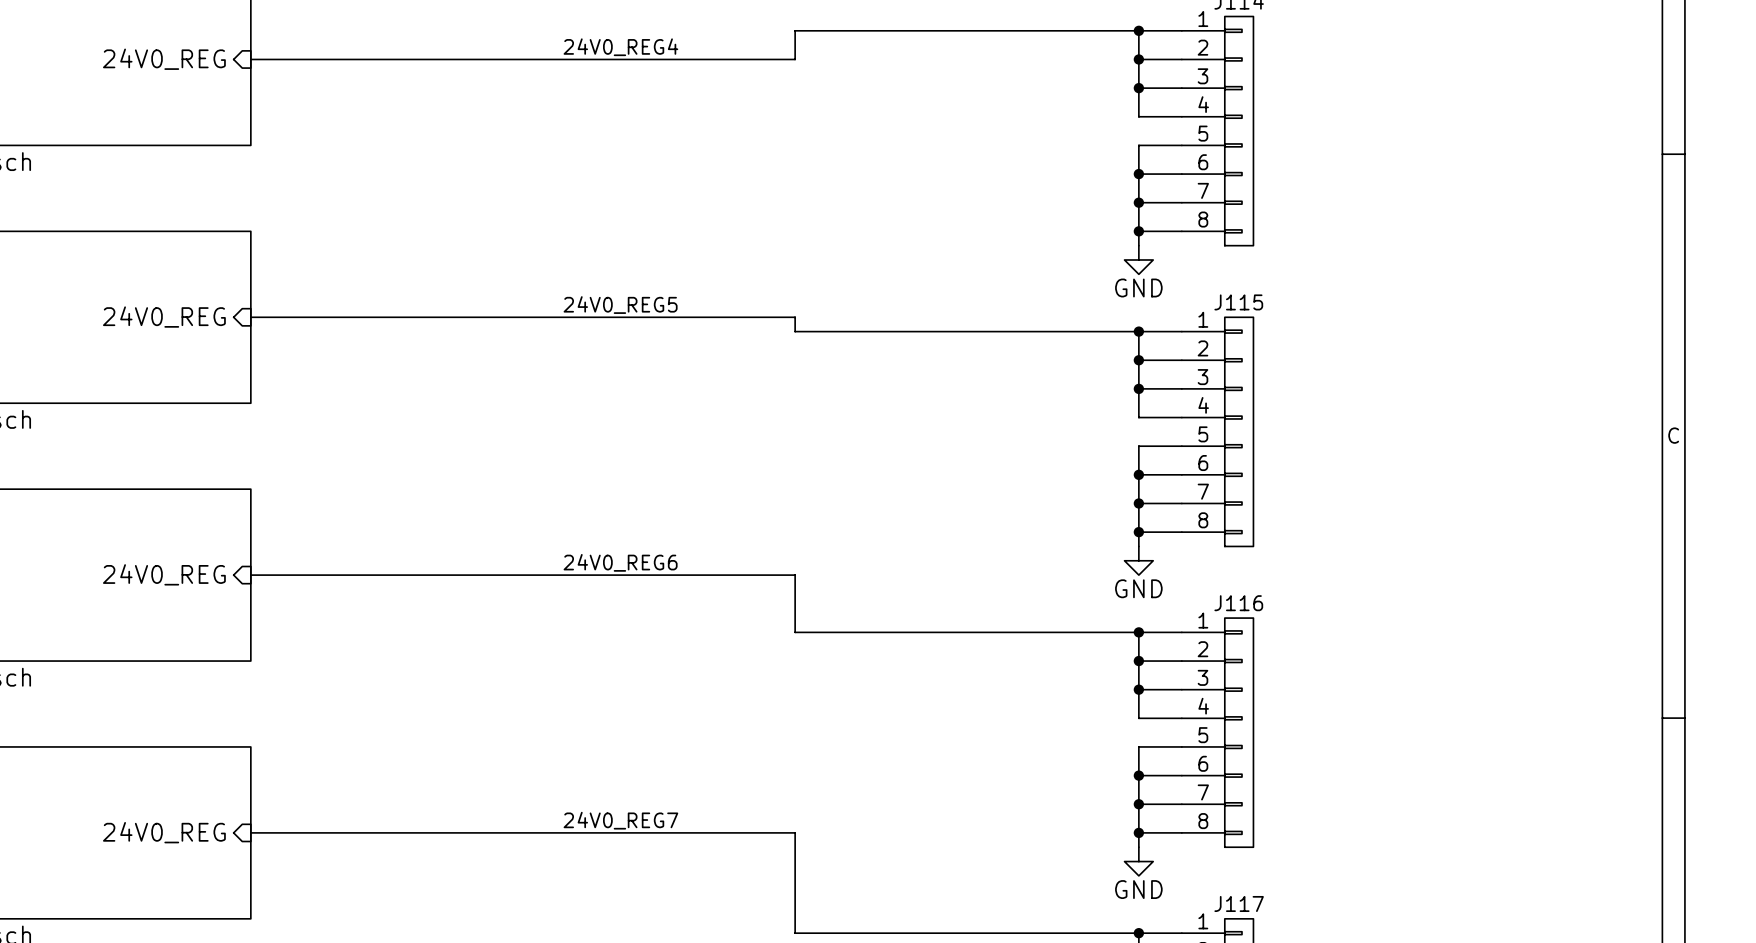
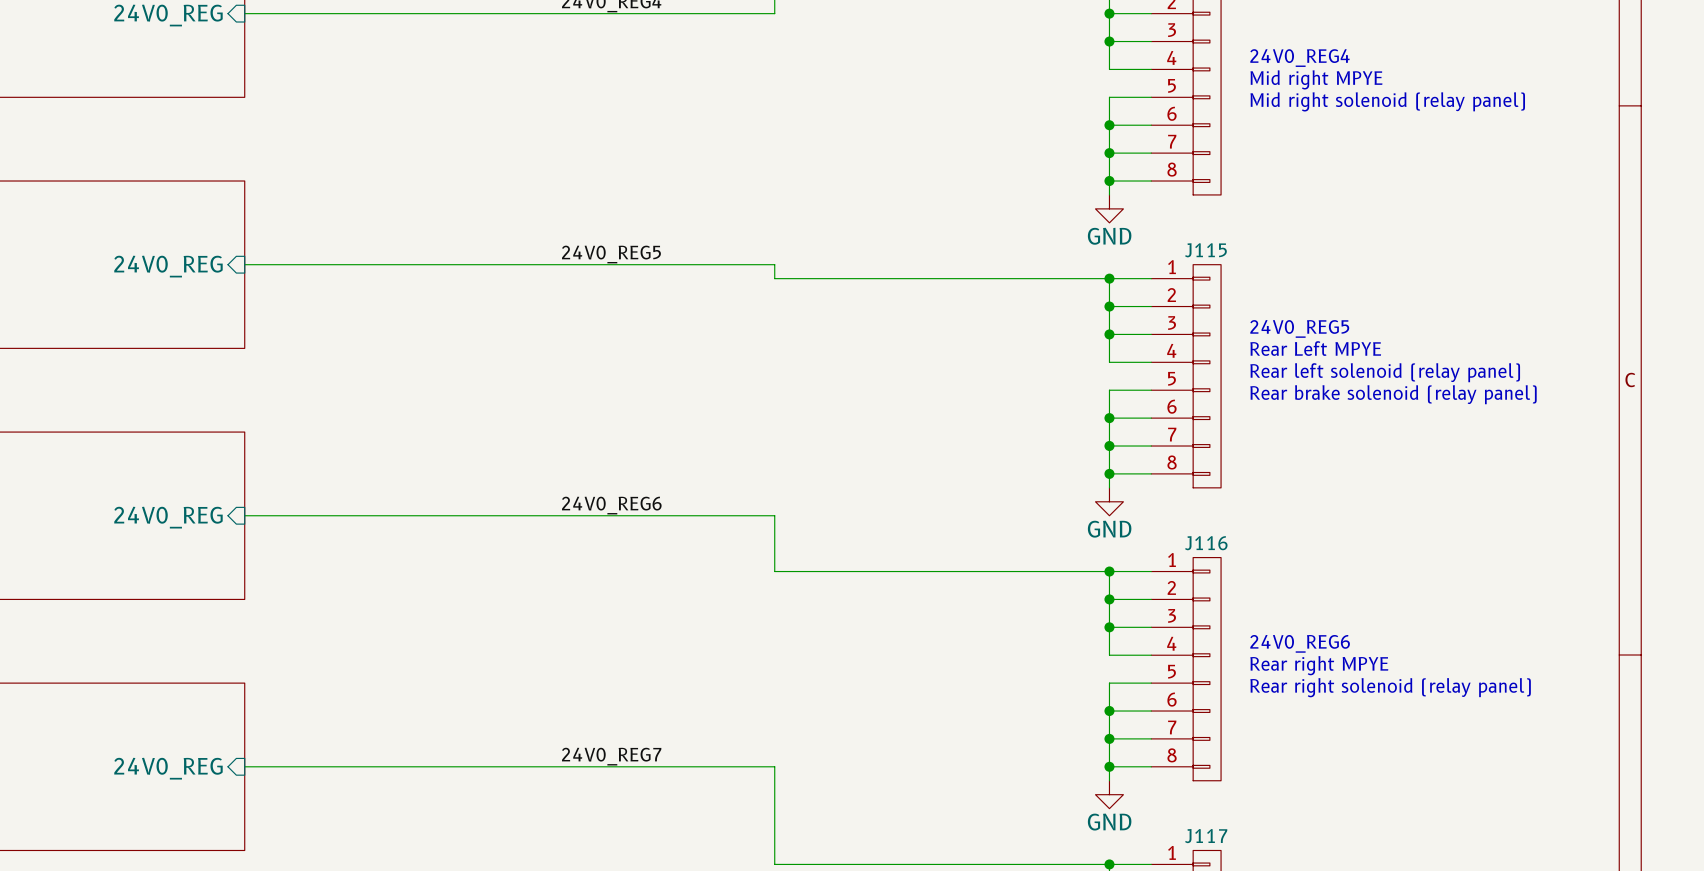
text: none -> 24V0_REG4 (1299, 58)
text: none -> Mid right MPYE (1316, 79)
text: none -> Mid right solenoid (relay panel) (1387, 101)
text: none -> 24V0_REG5 (1299, 328)
text: none -> Rear Left MPYE (1315, 348)
text: none -> Rear left solenoid (relay panel) (1385, 372)
text: none -> Rear brake solenoid (relay panel) (1393, 394)
text: none -> 24V0_REG6 (1300, 643)
text: none -> Rear right MPYE (1319, 665)
text: none -> Rear right solenoid (relay panel) (1390, 687)

